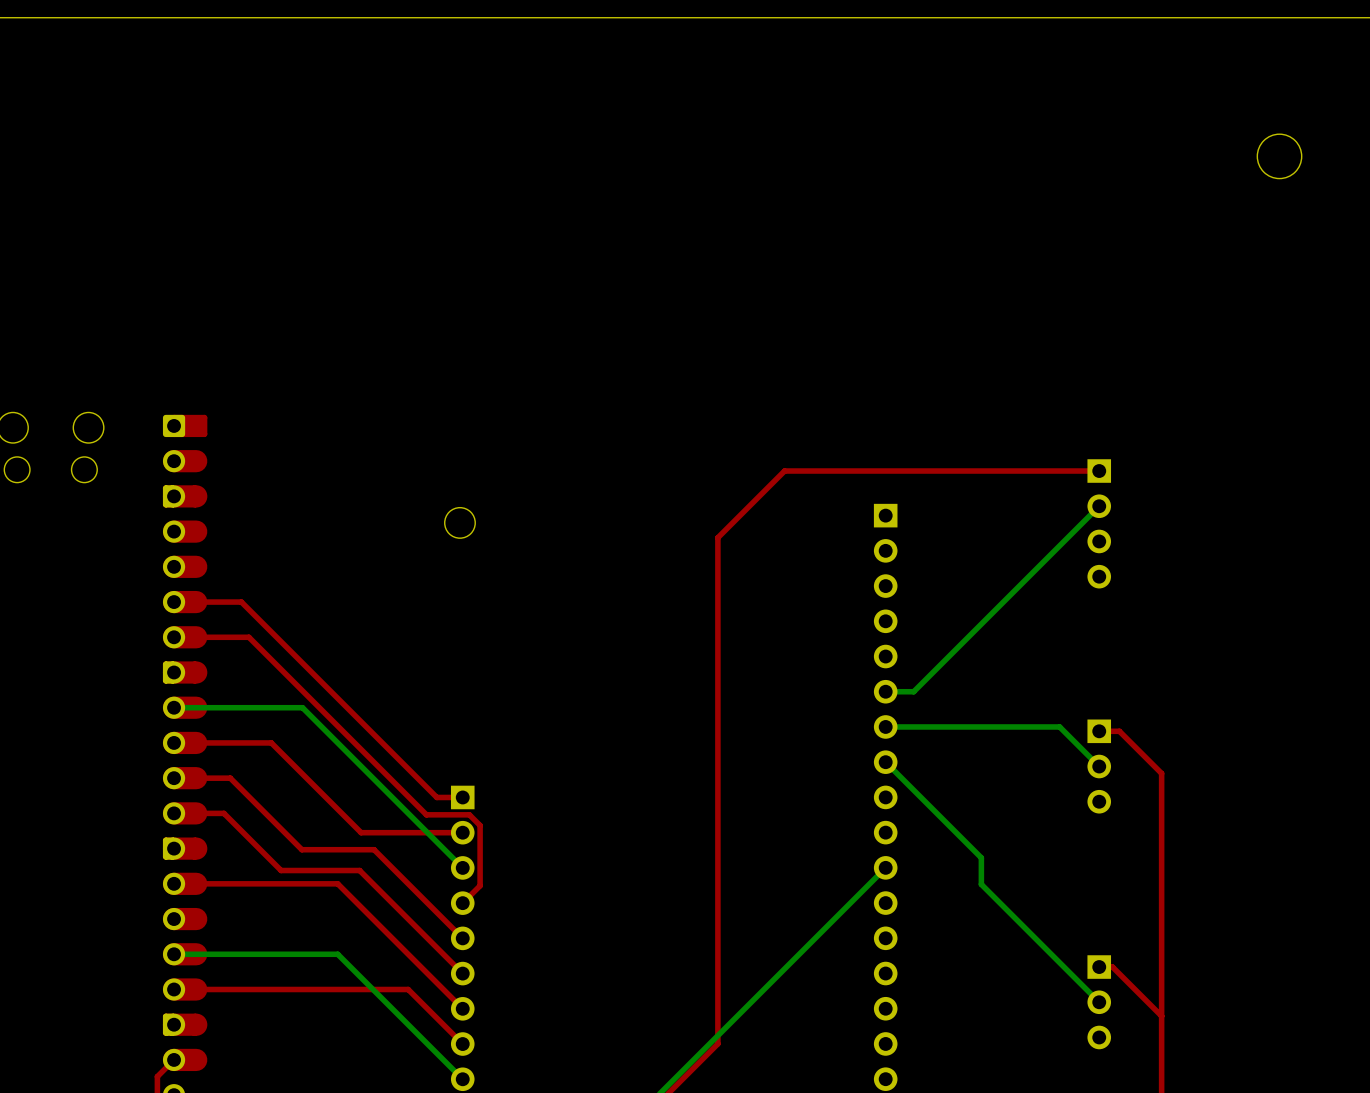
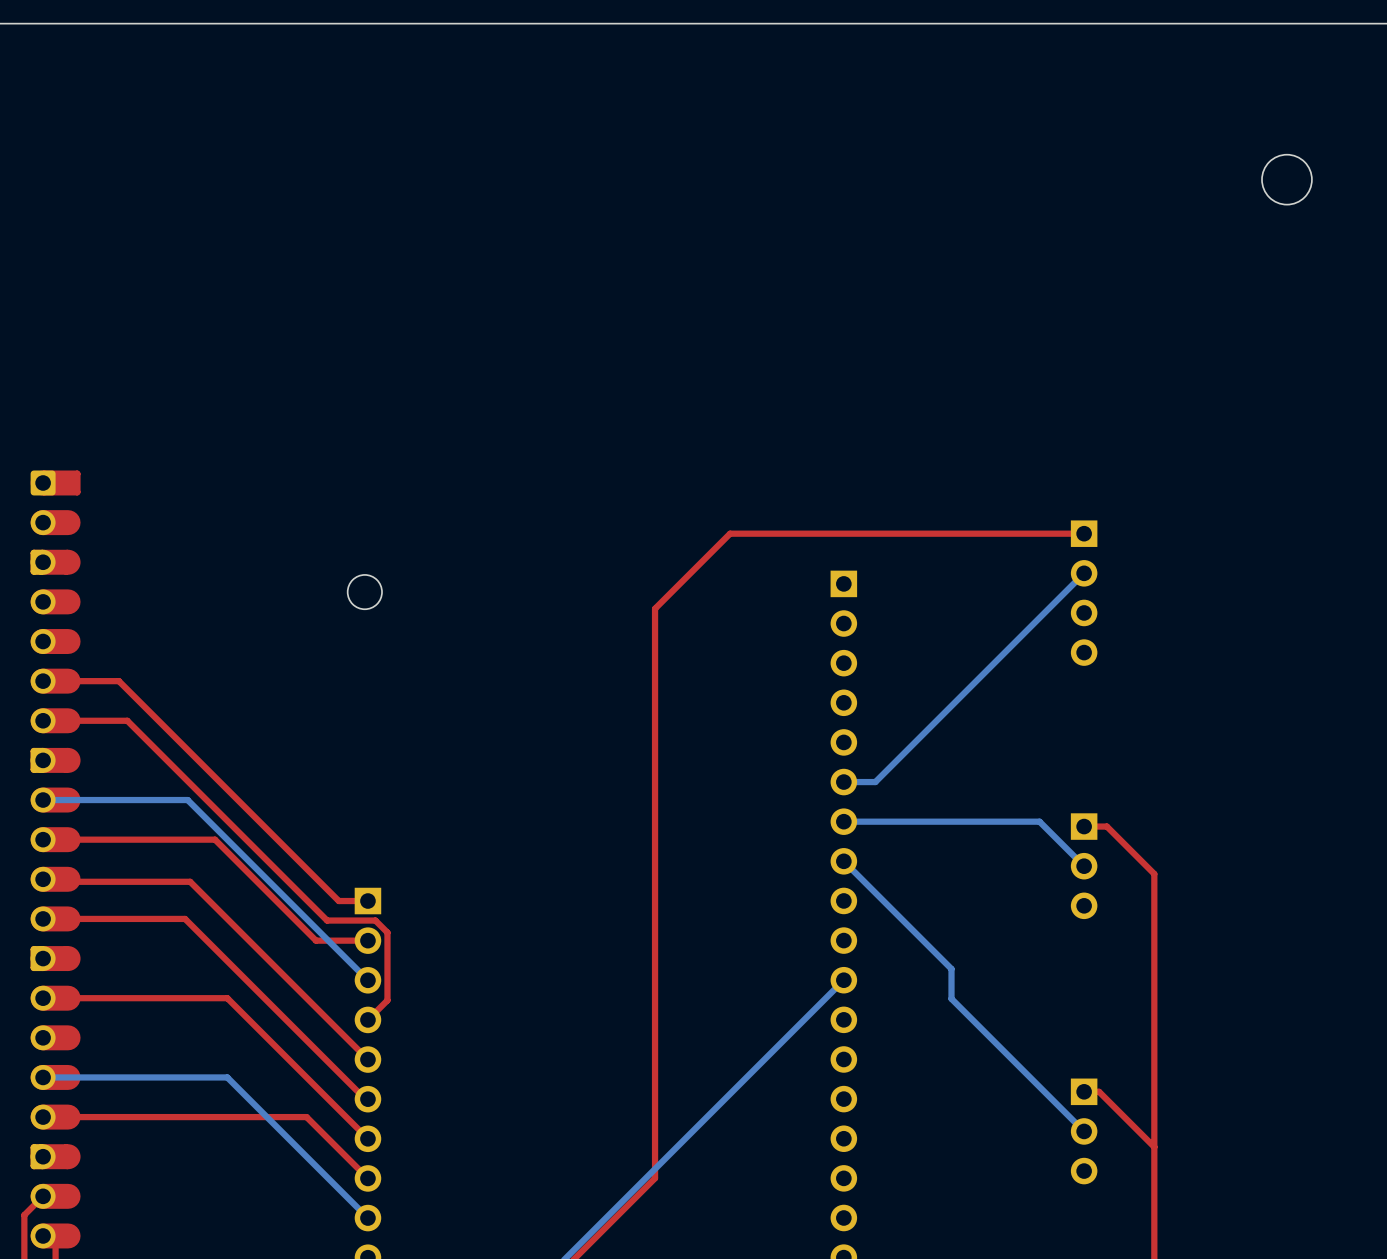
top track: (271, 742) (361, 832) (416, 832) -> (152, 839) (215, 839) (316, 940)
top track: (185, 778) (230, 778) (301, 849) (374, 849) -> (55, 879) (58, 881) (190, 881) (268, 959)
top track: (223, 813) (281, 870) (359, 870) (462, 973) -> (99, 918) (185, 918) (365, 1099) (367, 1099)

